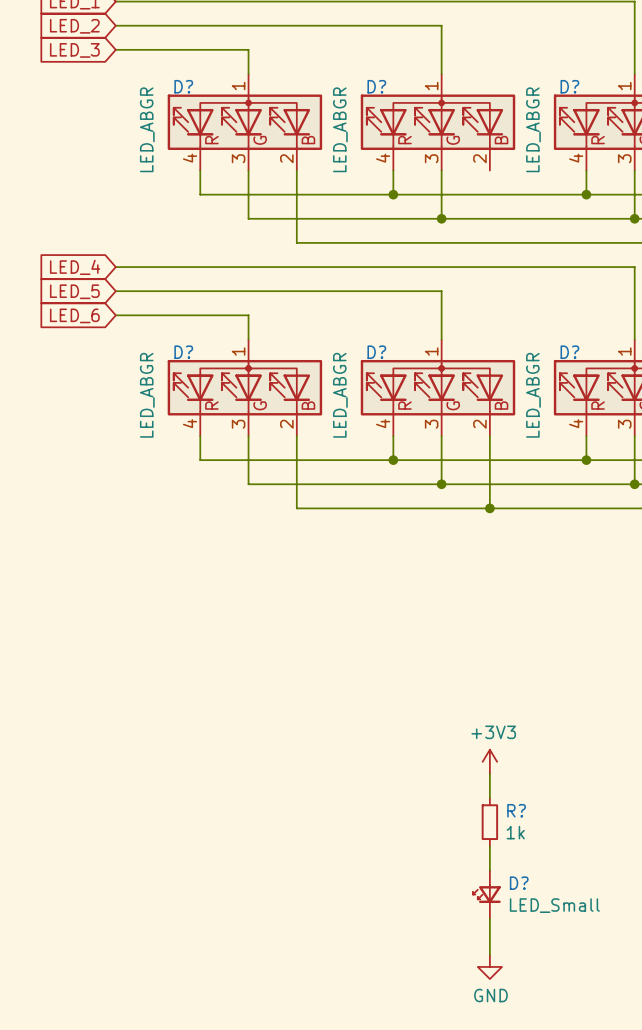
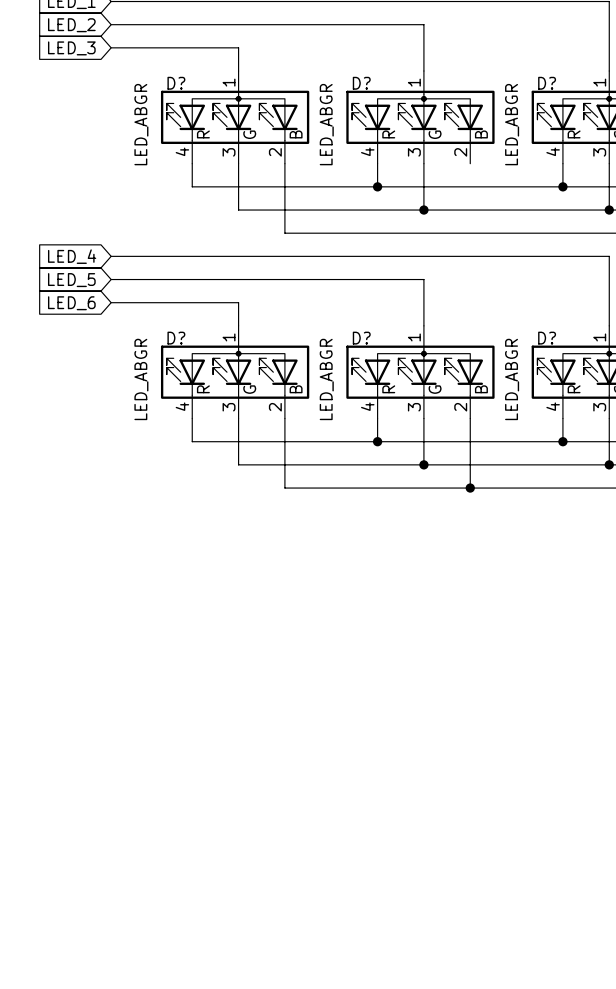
power symbol: +3V3 (489, 761) -> none
wire: (489, 773) (489, 798) -> none
R?: 1k (489, 822) -> none
wire: (489, 846) (489, 870) -> none
D?: LED_Small (486, 894) -> none
wire: (489, 918) (489, 954) -> none
power symbol: GND (489, 966) -> none

